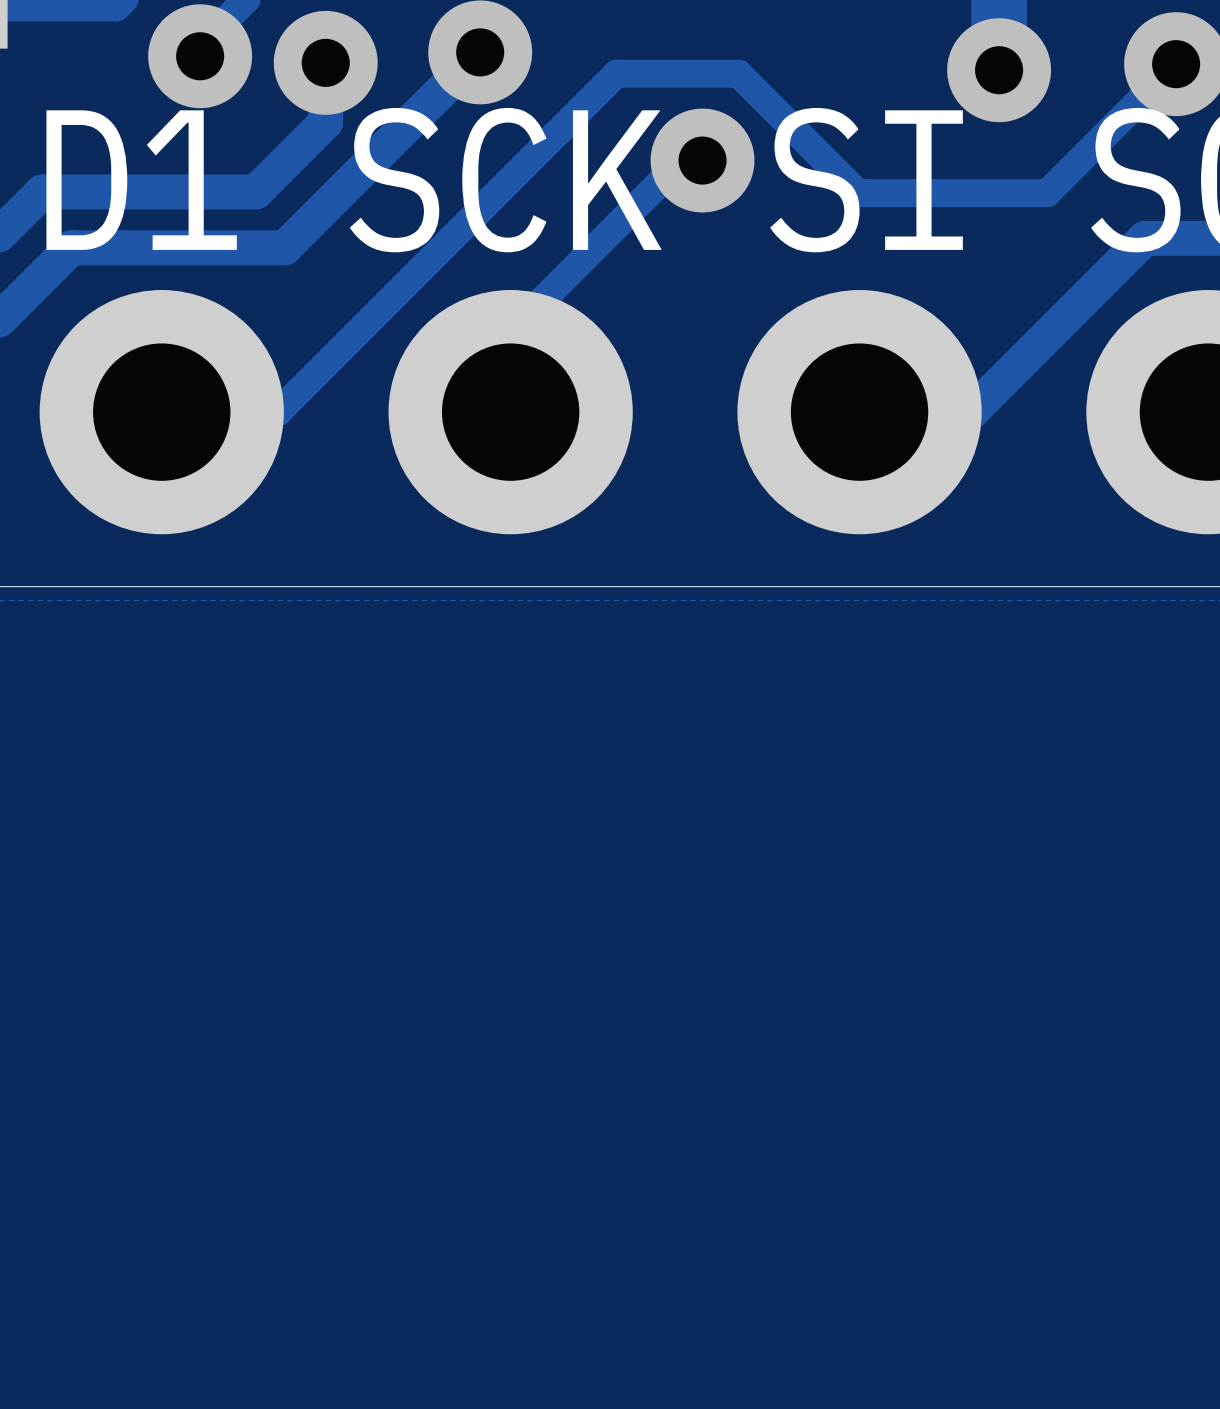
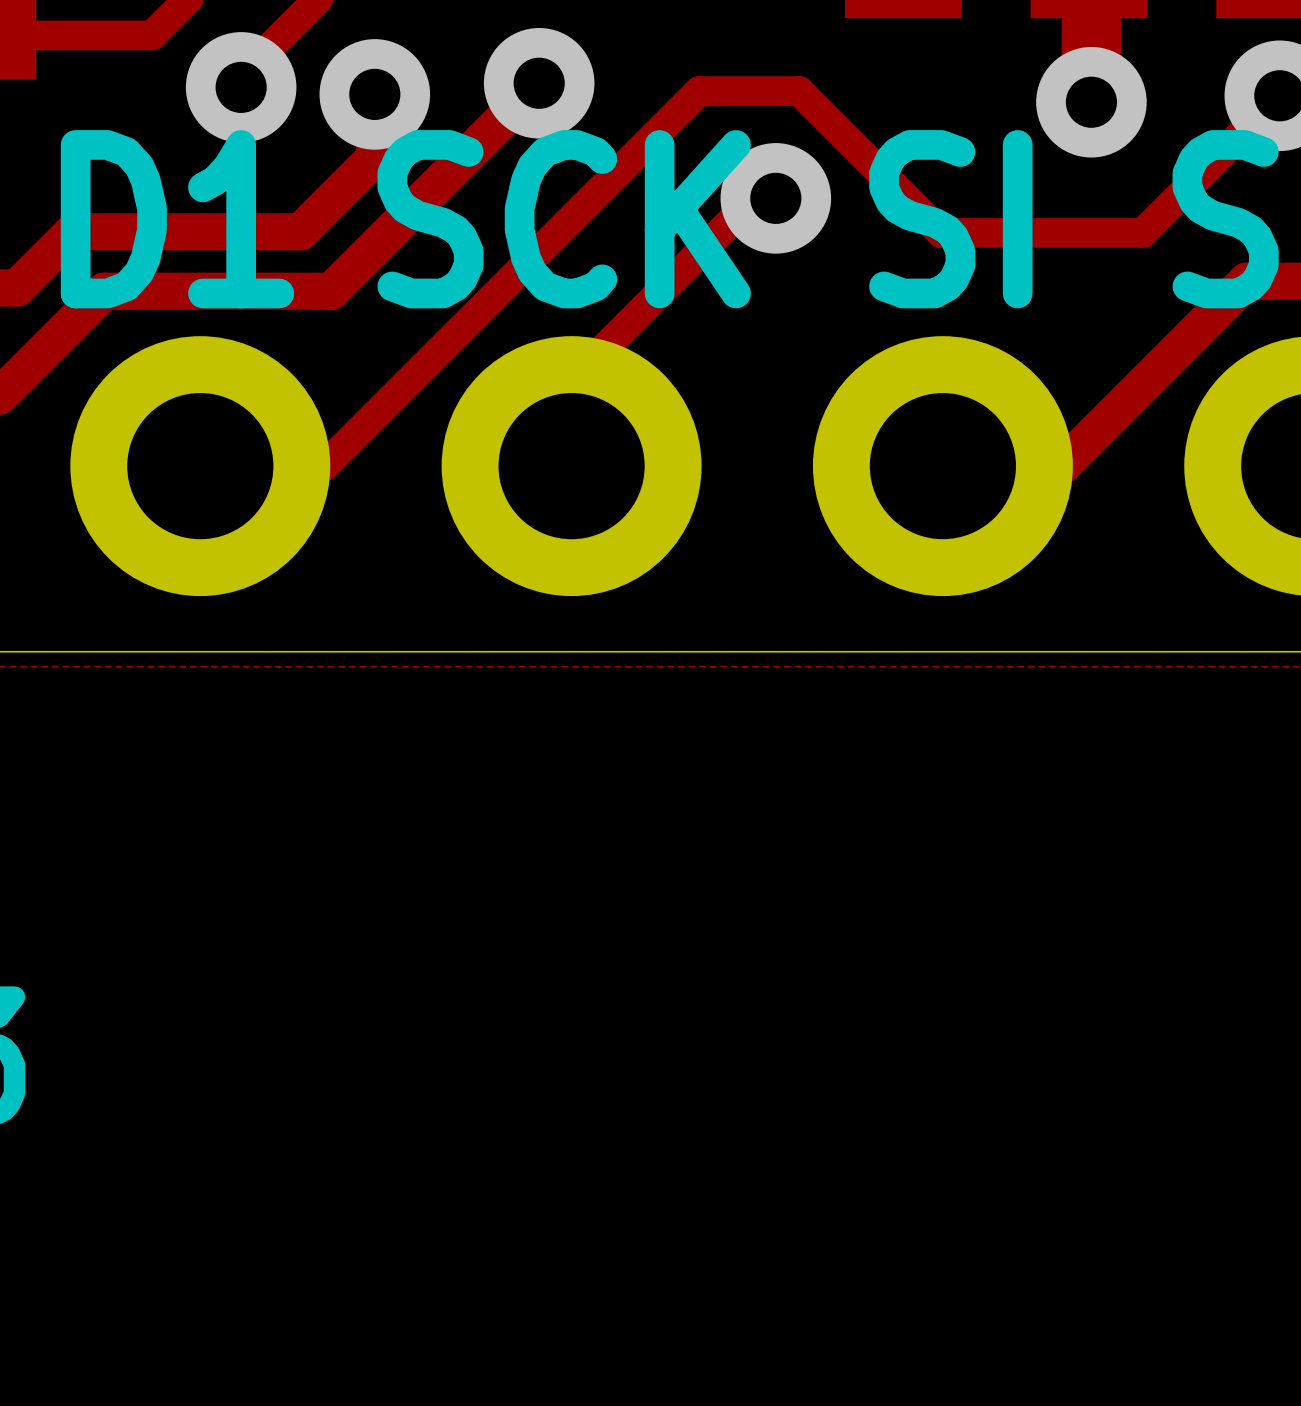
track: (616, 73) (738, 73) -> (684, 105) (699, 91) (799, 91) (814, 105)

